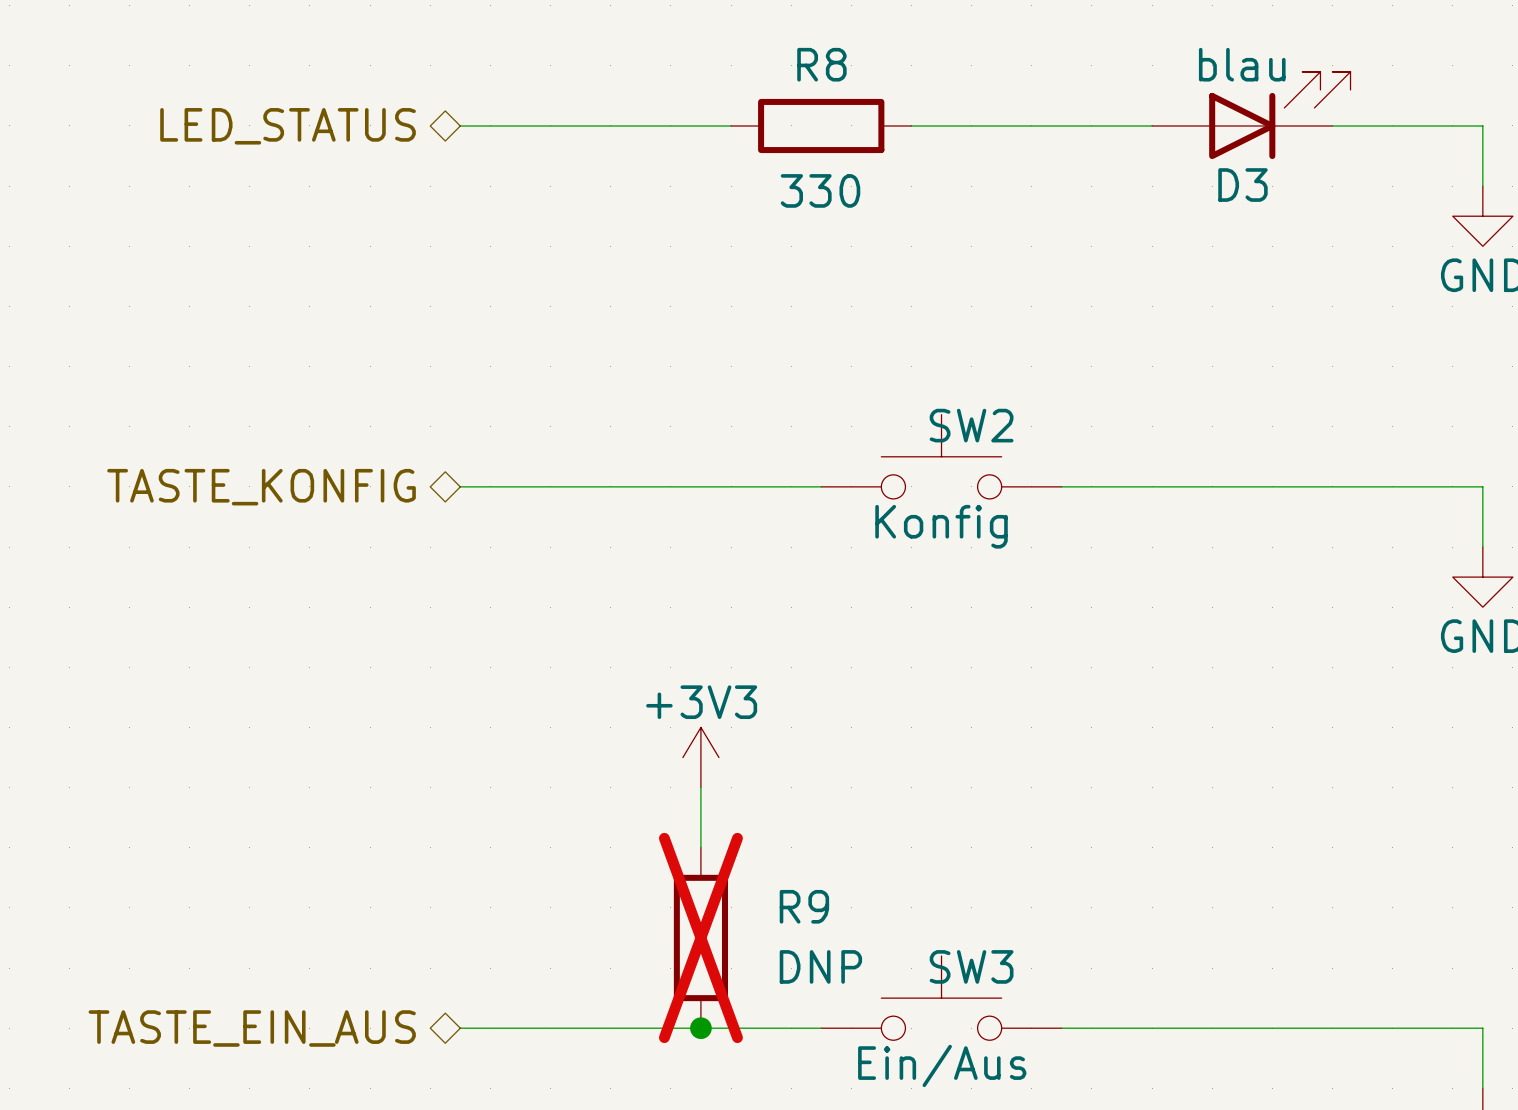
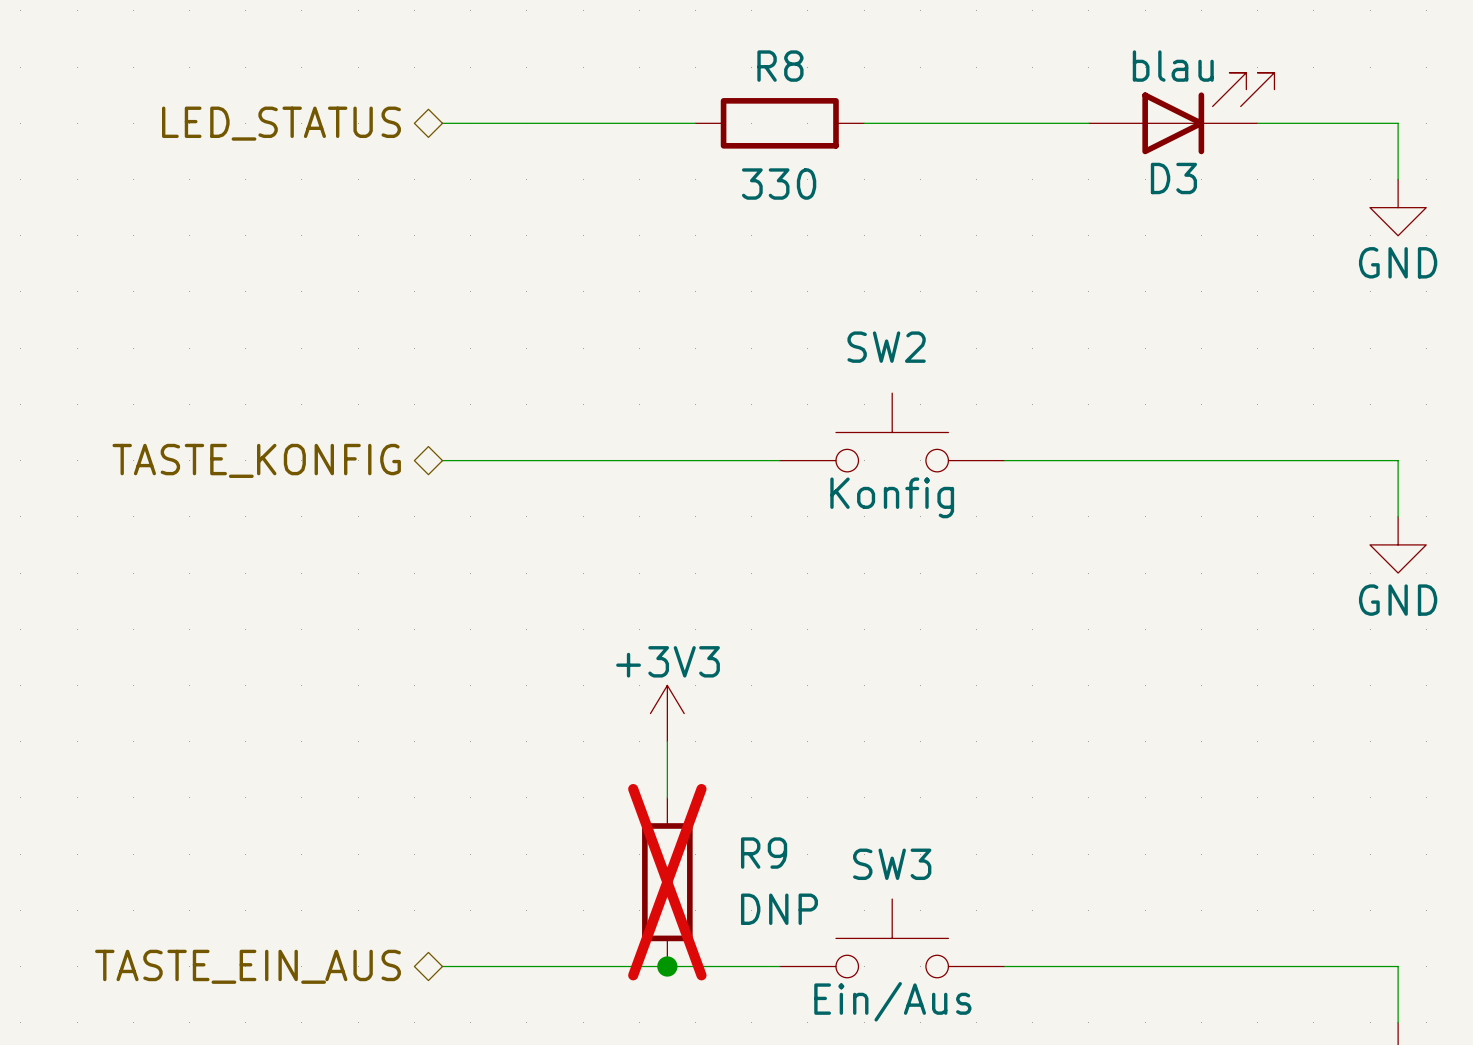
SW2 name position: SW2 (971, 425) -> SW2 (886, 347)
SW3 name position: SW3 (971, 966) -> SW3 (892, 864)

